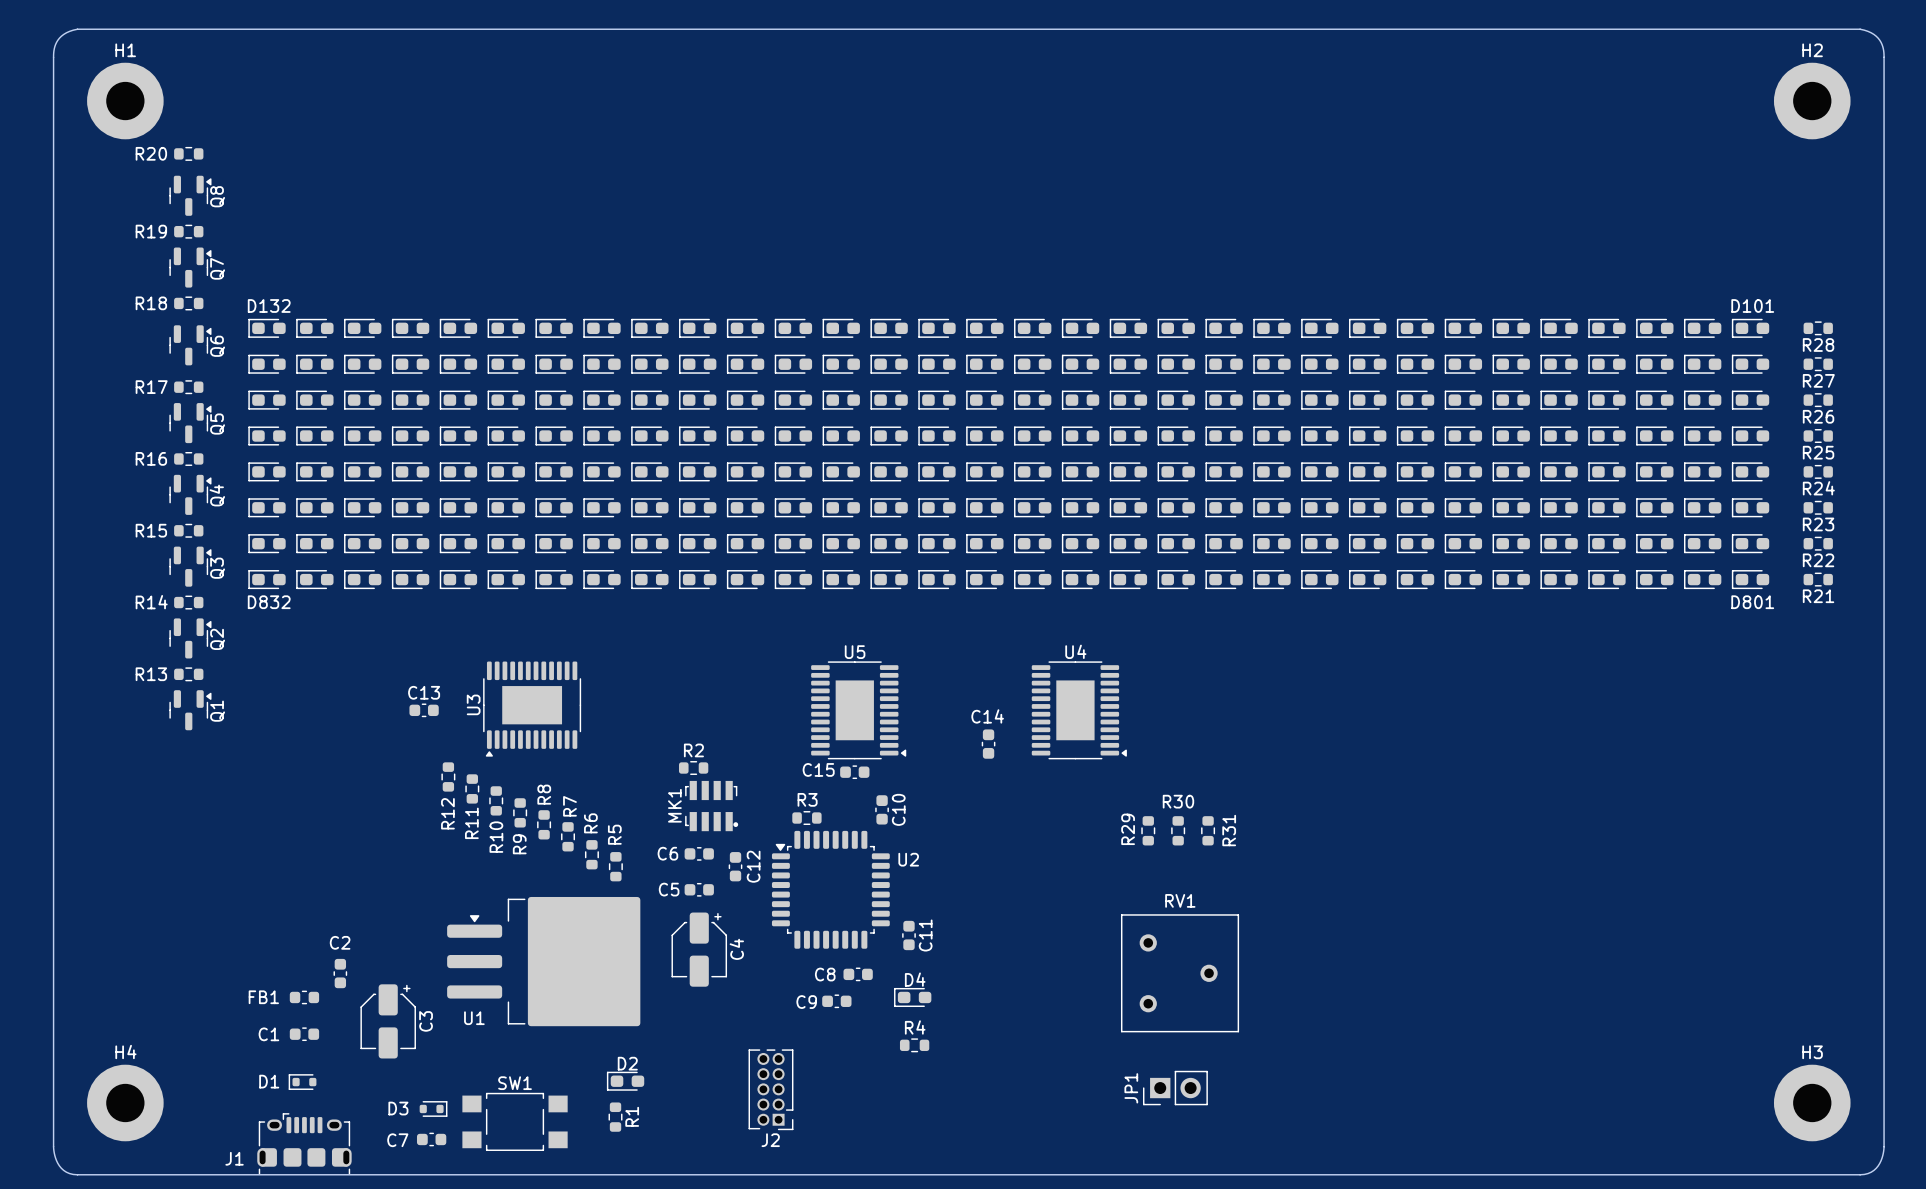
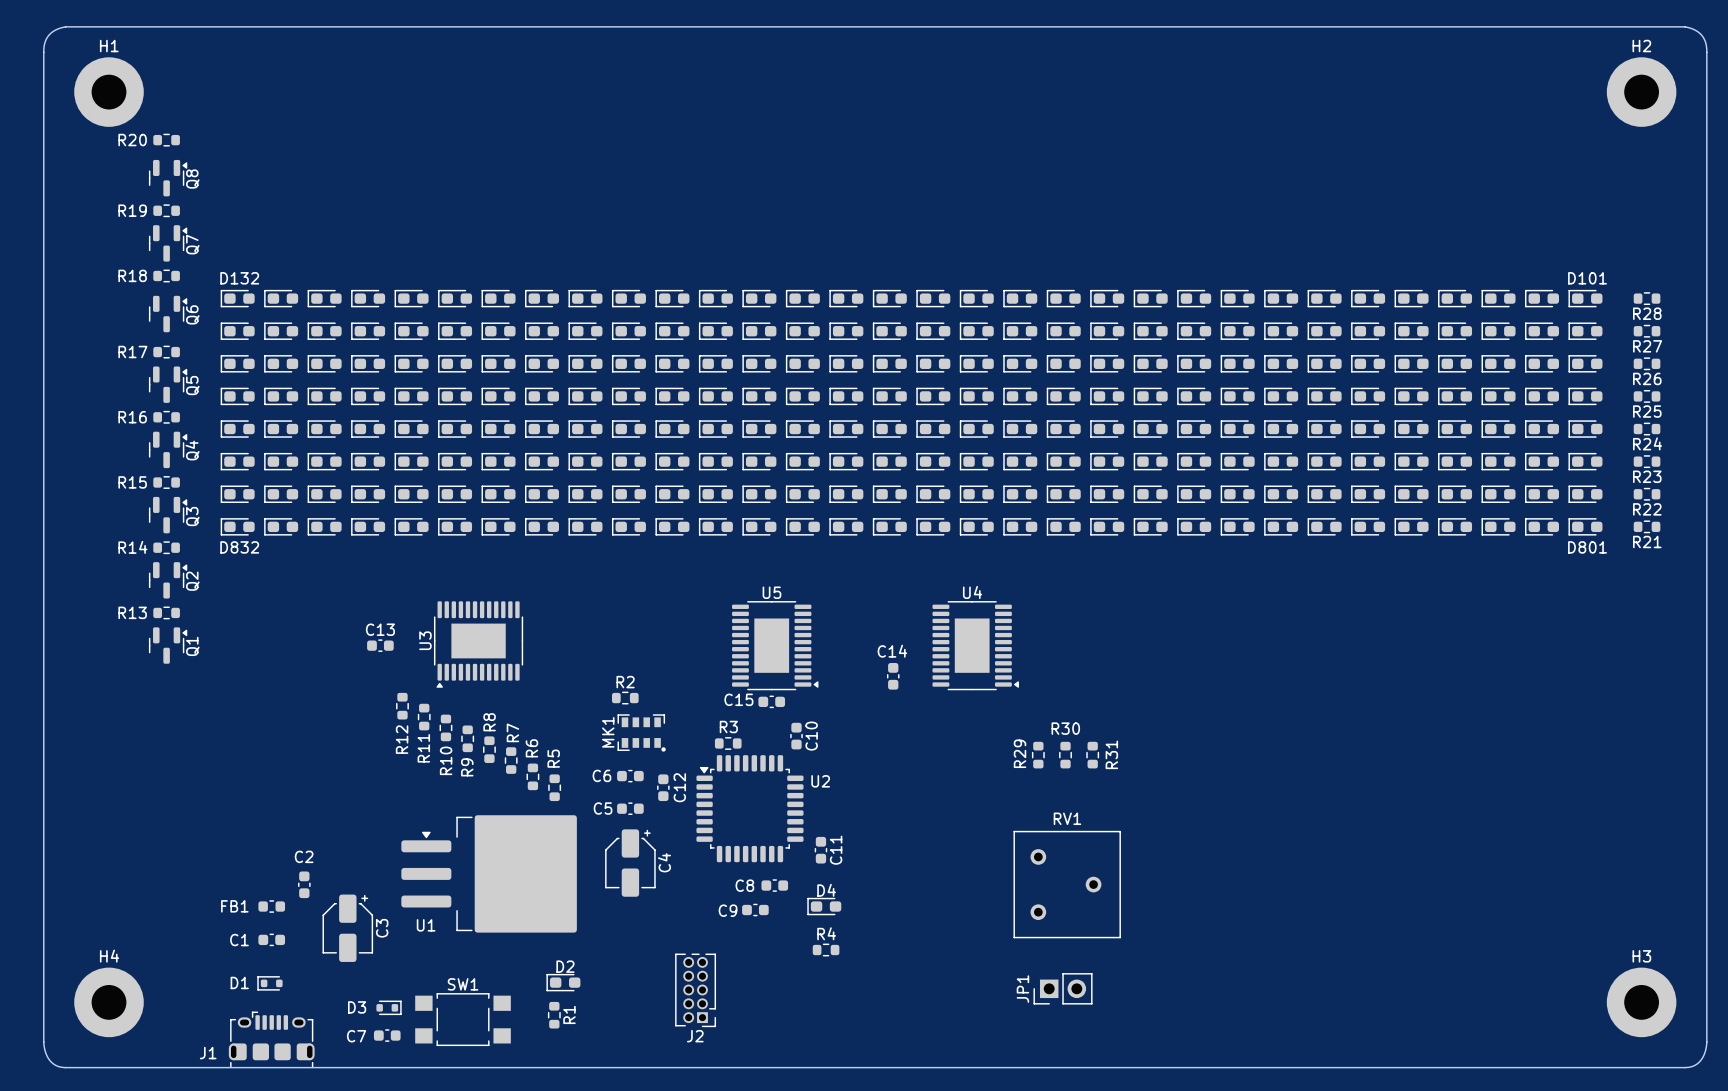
MK1 footprint: [685, 780, 739, 832] -> [617, 714, 666, 752]

